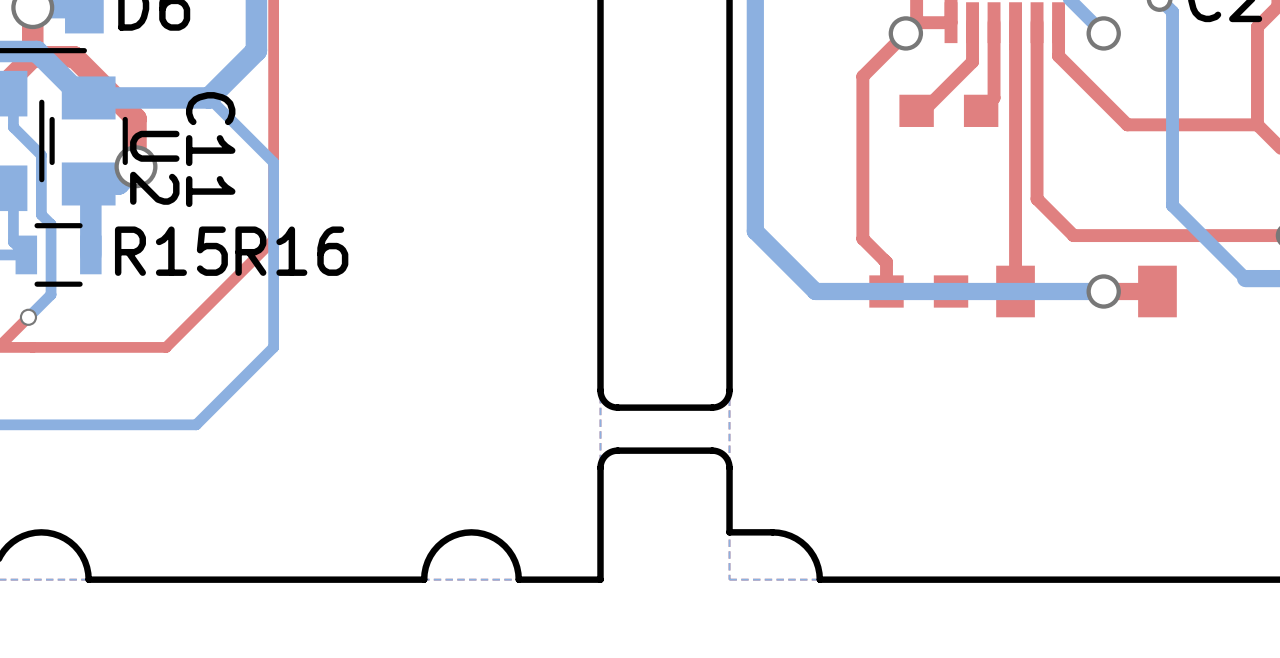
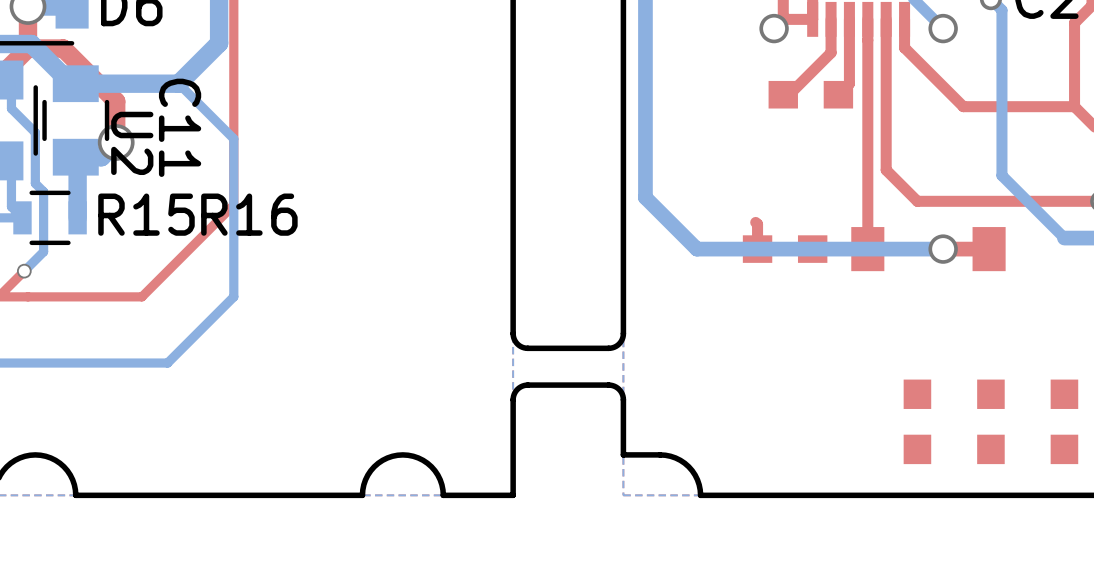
top track: (905, 33) (862, 76) (862, 238) (884, 260) -> none
part: none -> (917, 421)
part: none -> (990, 421)
part: none -> (1064, 421)

